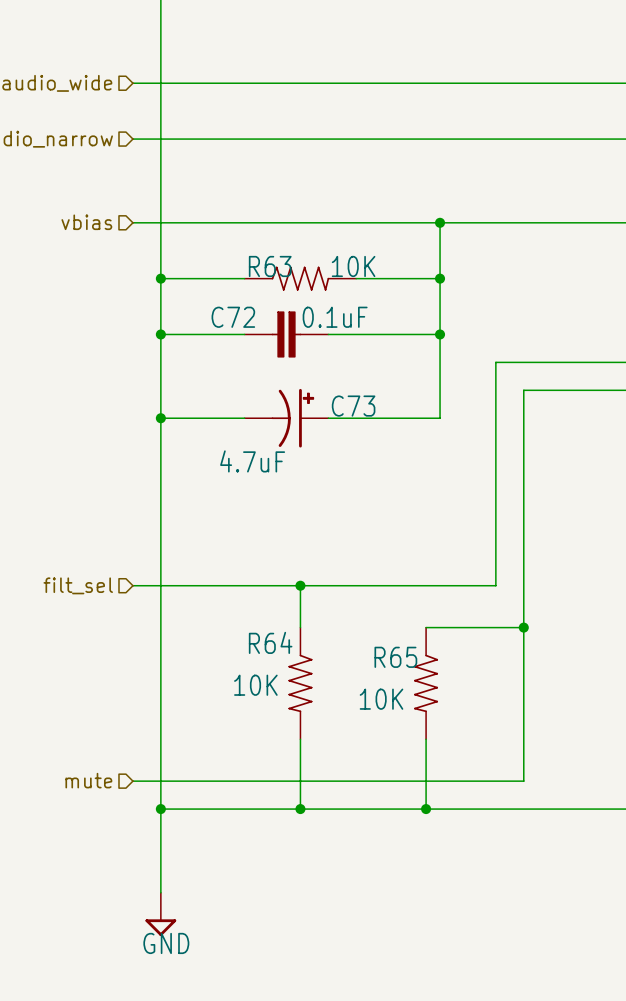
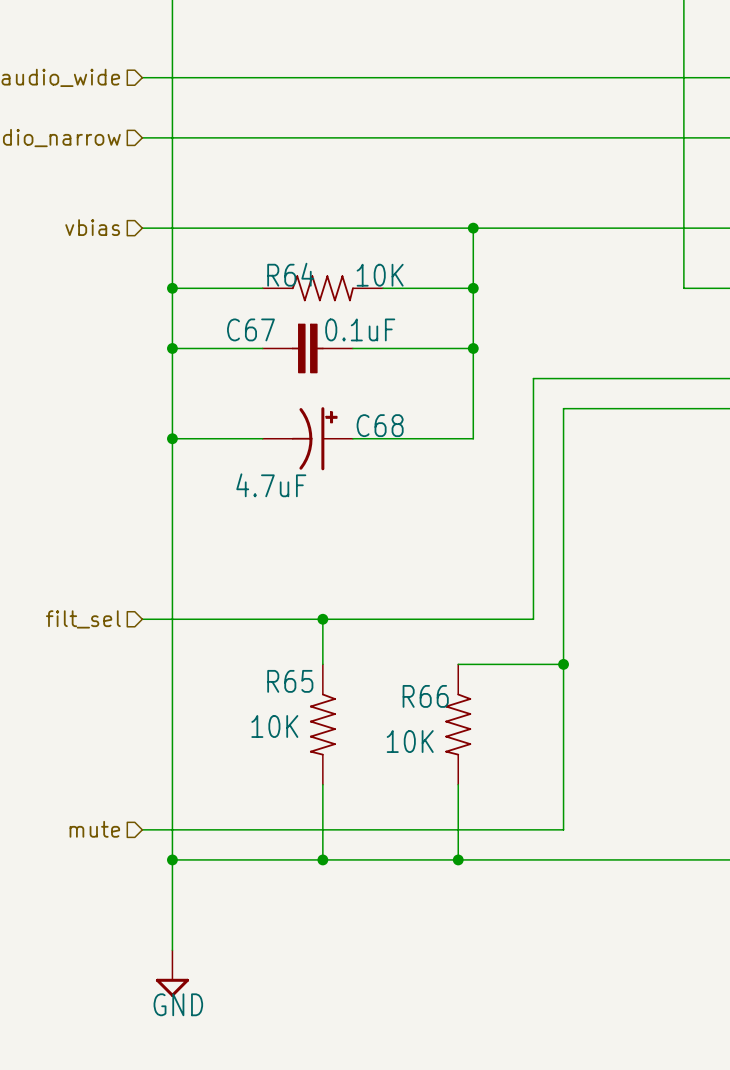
R63 name: R63 (270, 266) -> R64 (290, 274)
C72 name: C72 (233, 317) -> C67 (250, 329)
C73 name: C73 (353, 406) -> C68 (380, 425)
R64 name: R64 (270, 642) -> R65 (290, 681)
R65 name: R65 (395, 657) -> R66 (425, 696)

